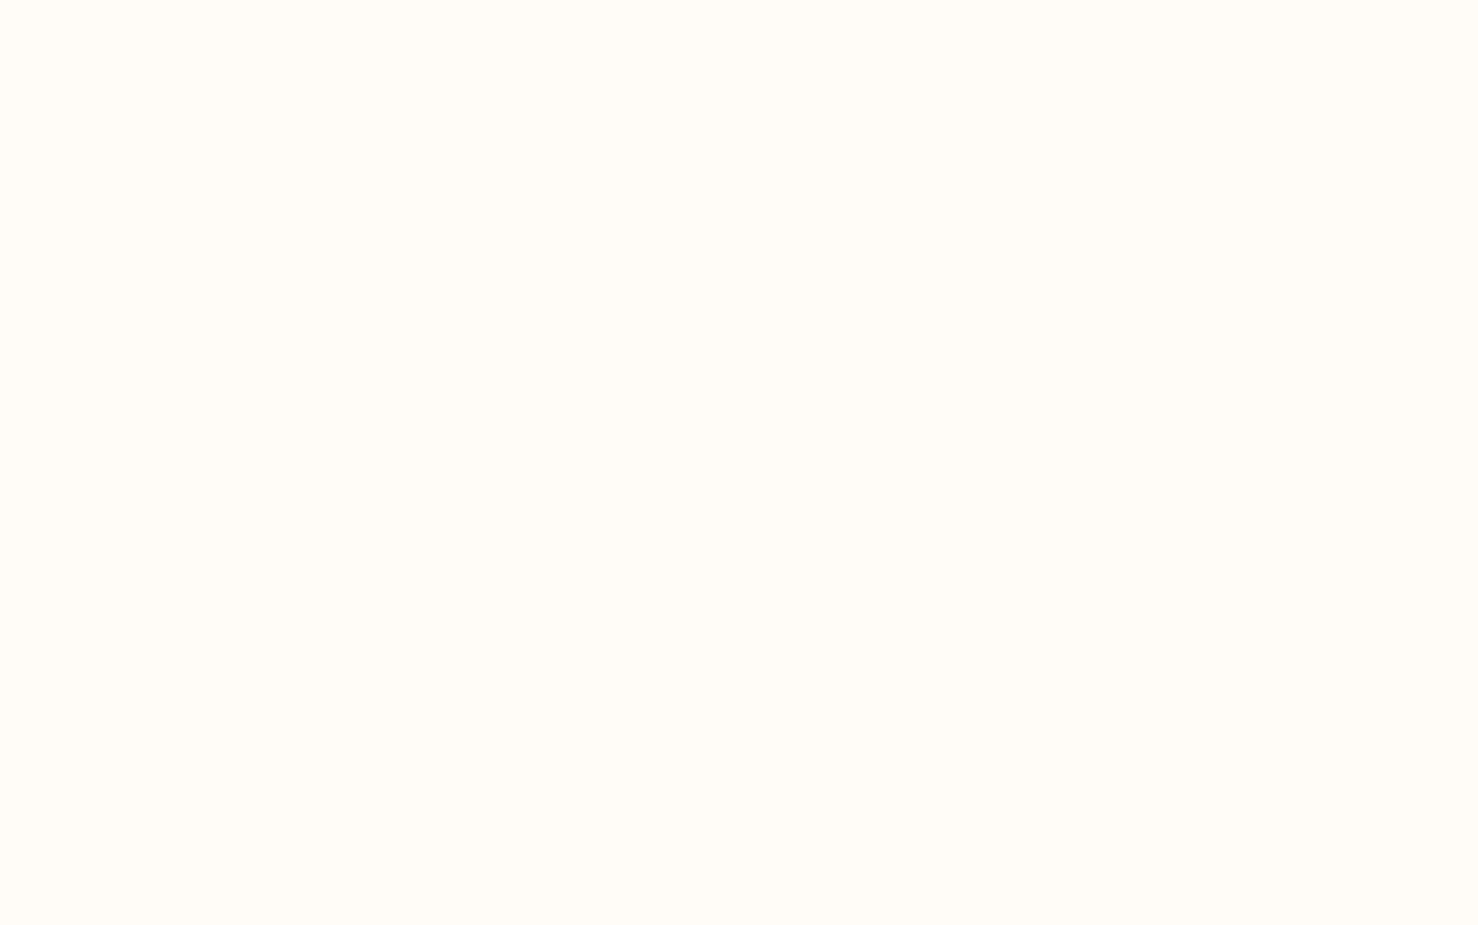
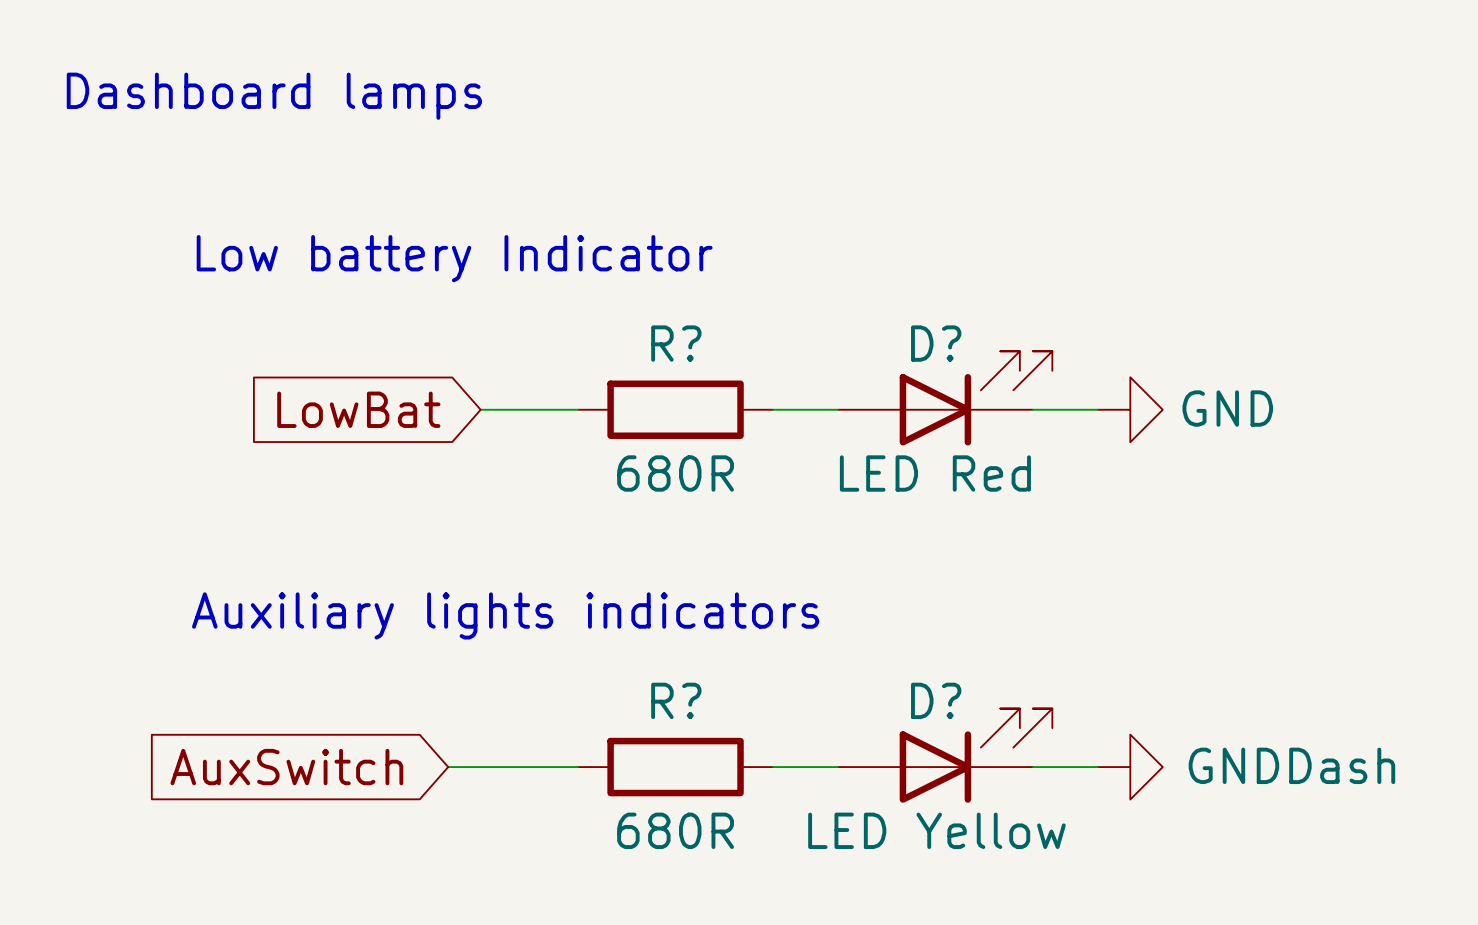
text: none -> Dashboard lamps (274, 96)
text: none -> Low battery Indicator (454, 258)
D?: none -> LED Red (945, 398)
global label: none -> LowBat (358, 409)
wire: none -> (480, 409) (578, 409)
R?: none -> 680R (675, 409)
wire: none -> (773, 409) (837, 409)
wire: none -> (1032, 409) (1097, 409)
power symbol: none -> GND (1130, 409)
text: none -> Auxiliary lights indicators (505, 615)
D?: none -> LED Yellow (945, 755)
global label: none -> AuxSwitch (286, 767)
wire: none -> (448, 767) (578, 767)
R?: none -> 680R (675, 767)
wire: none -> (773, 767) (837, 767)
wire: none -> (1032, 767) (1097, 767)
power symbol: none -> GNDDash (1130, 767)

